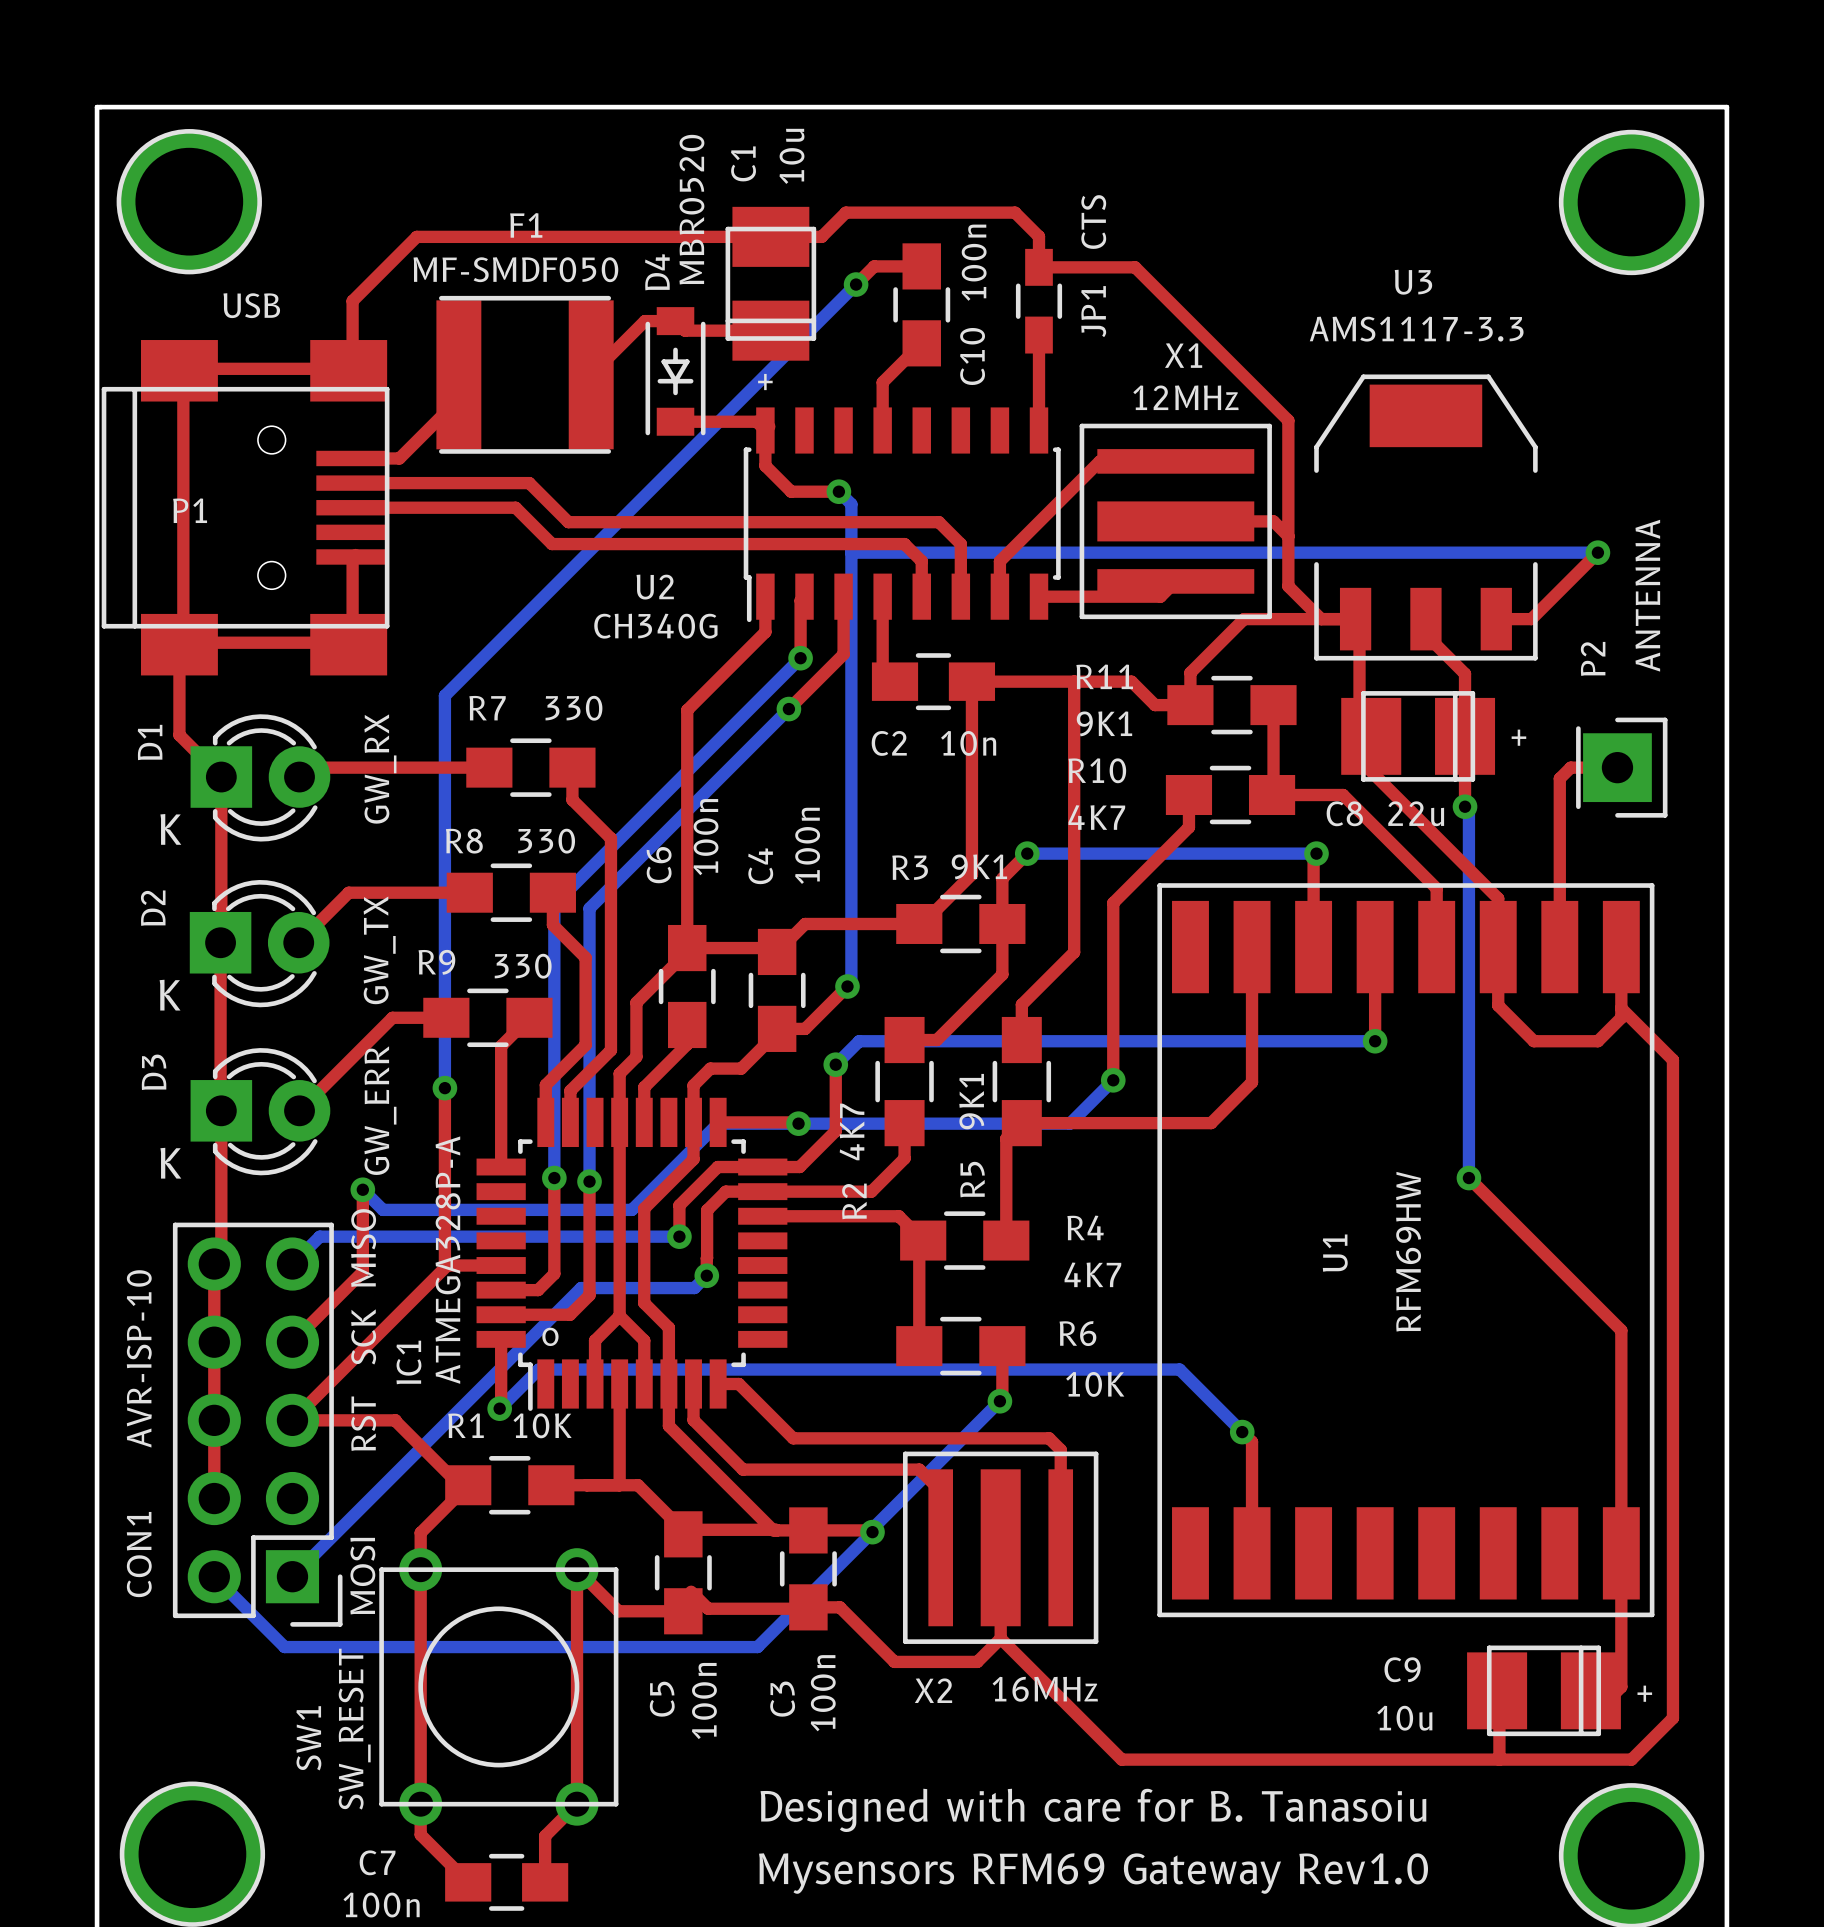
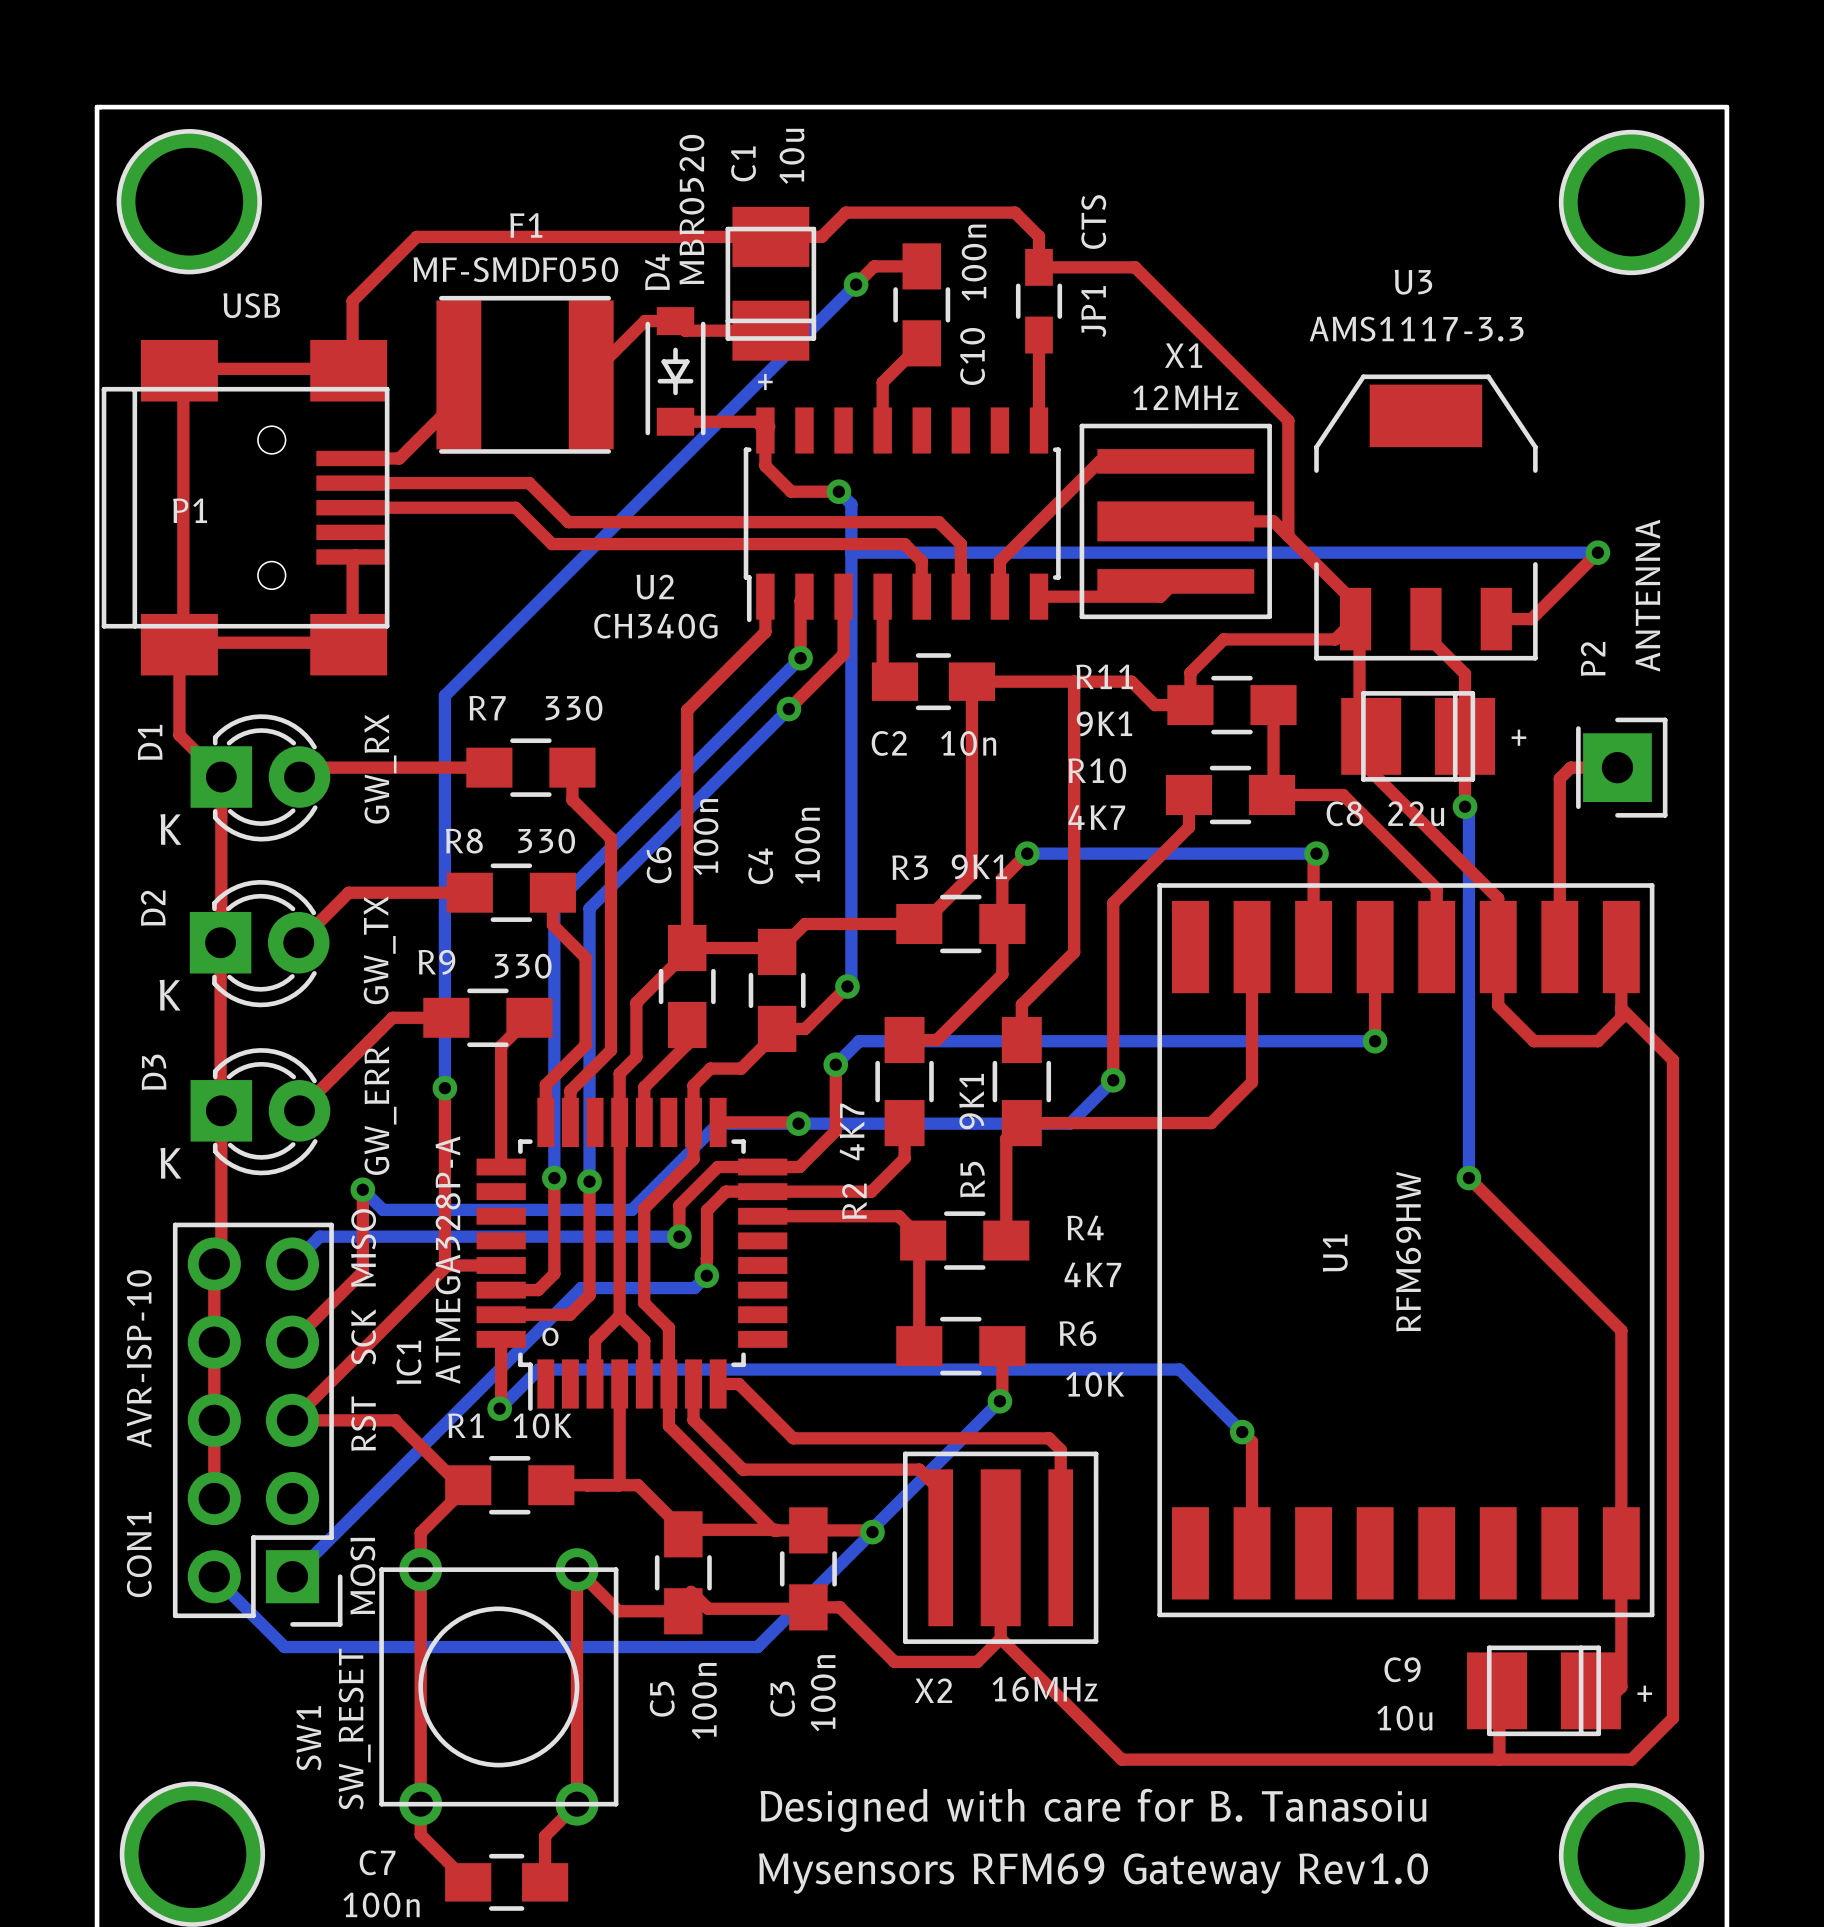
top track: (1288, 536) (1288, 586) (1321, 619) -> (1288, 536) (1355, 603) (1355, 619) (1335, 639) (1223, 639)
top track: (1355, 619) (1244, 619) (1223, 639) -> none

